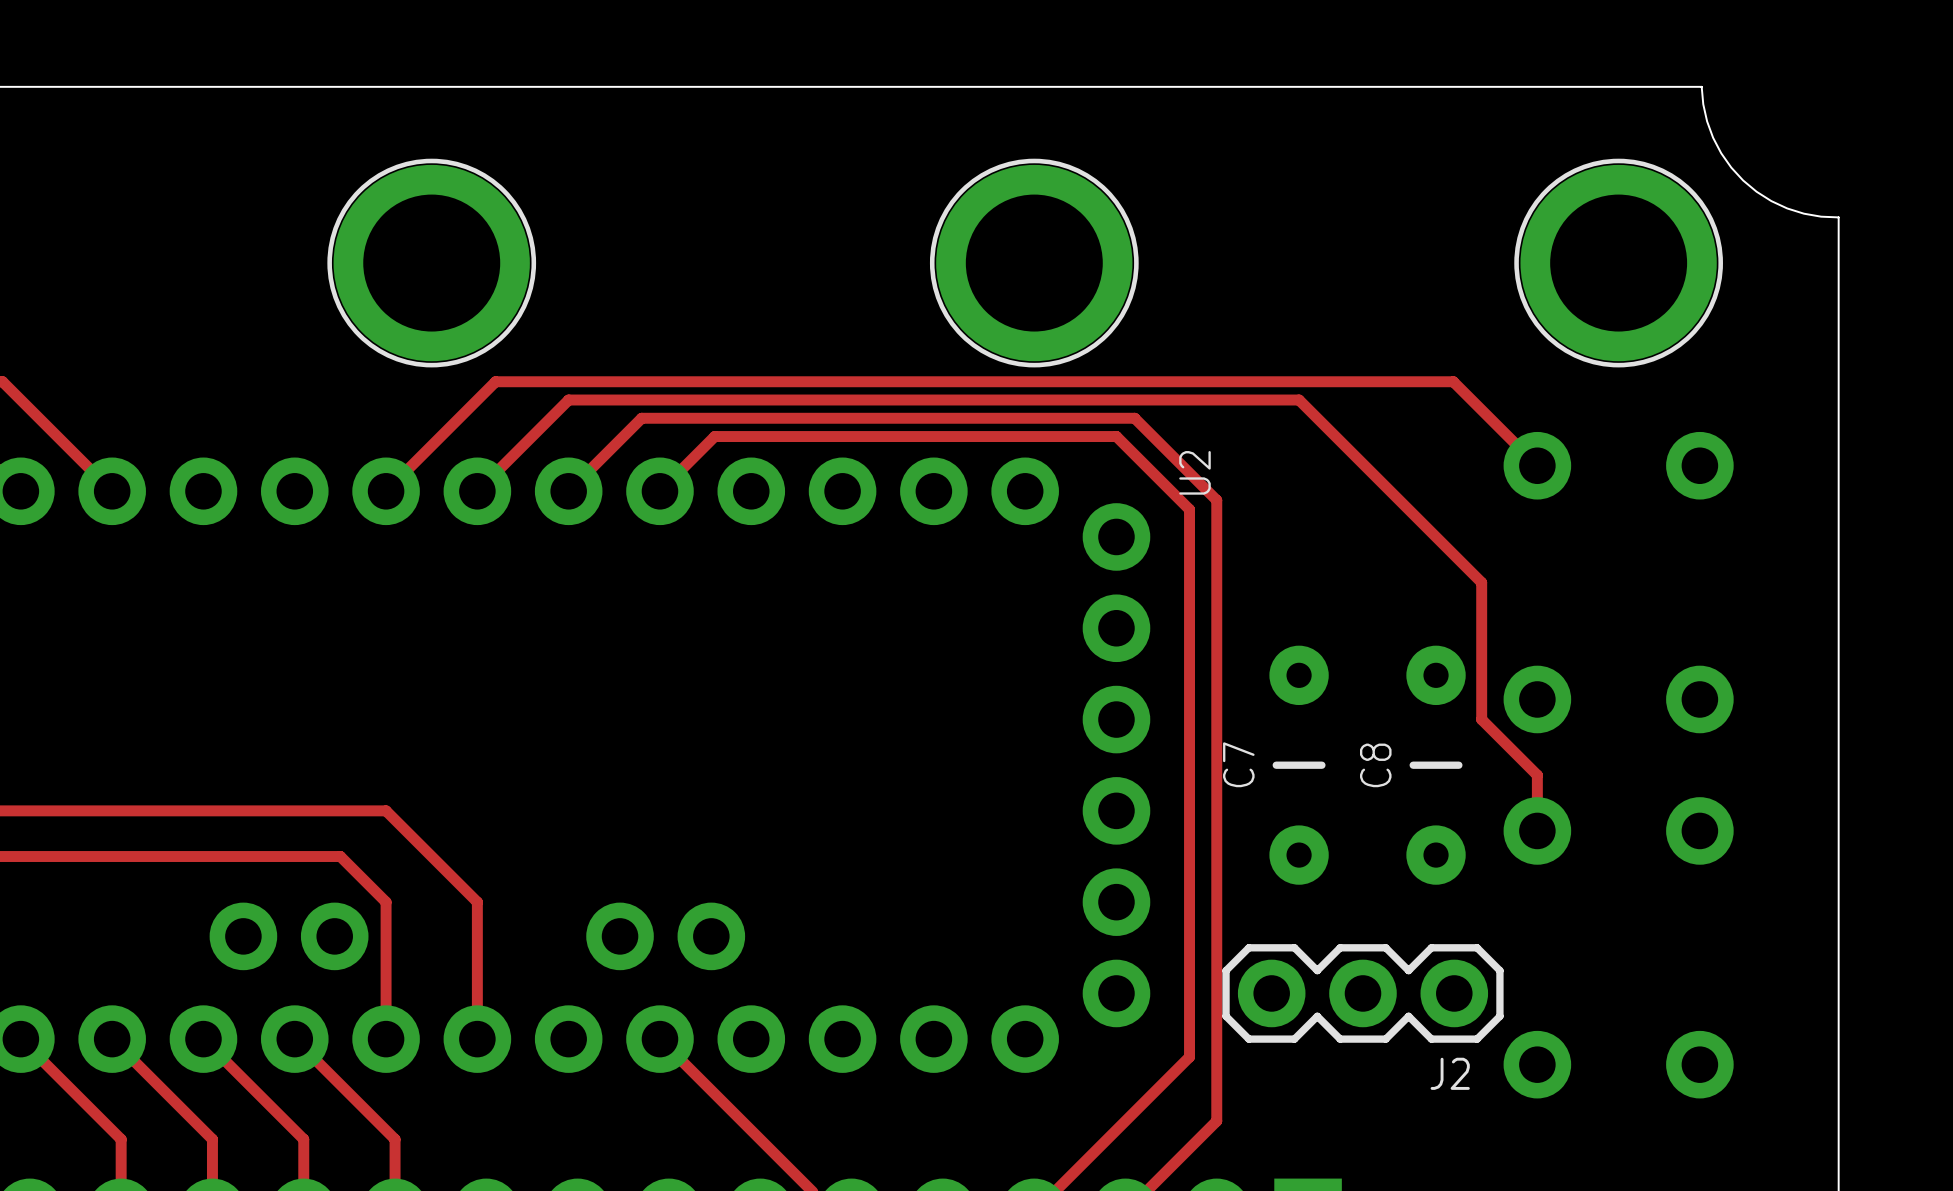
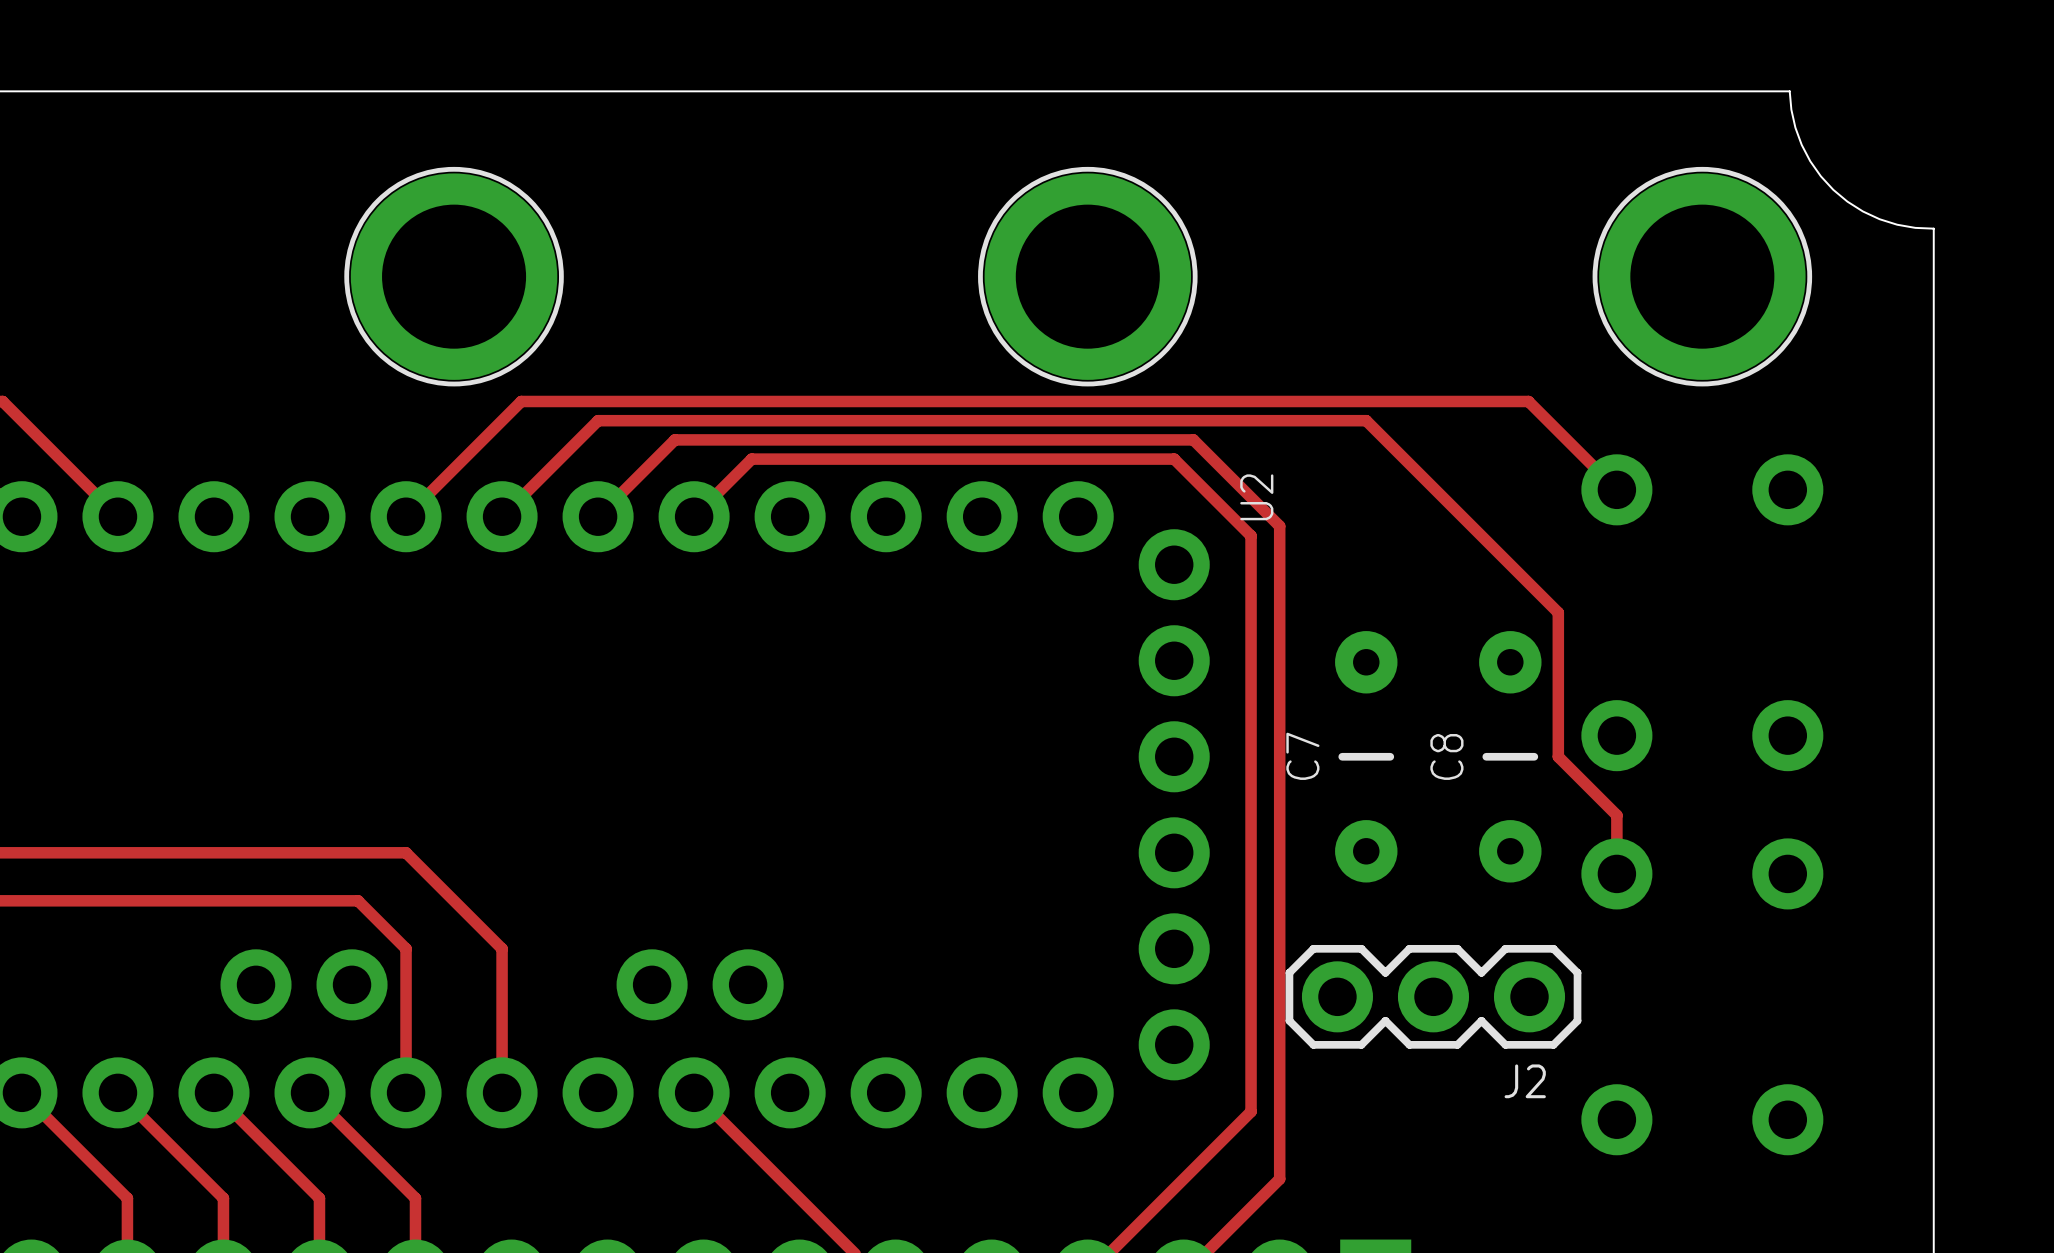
C7 position: (1299, 765) -> (1366, 756)
C8 position: (1436, 765) -> (1510, 756)
J2 position: (1362, 993) -> (1433, 996)

